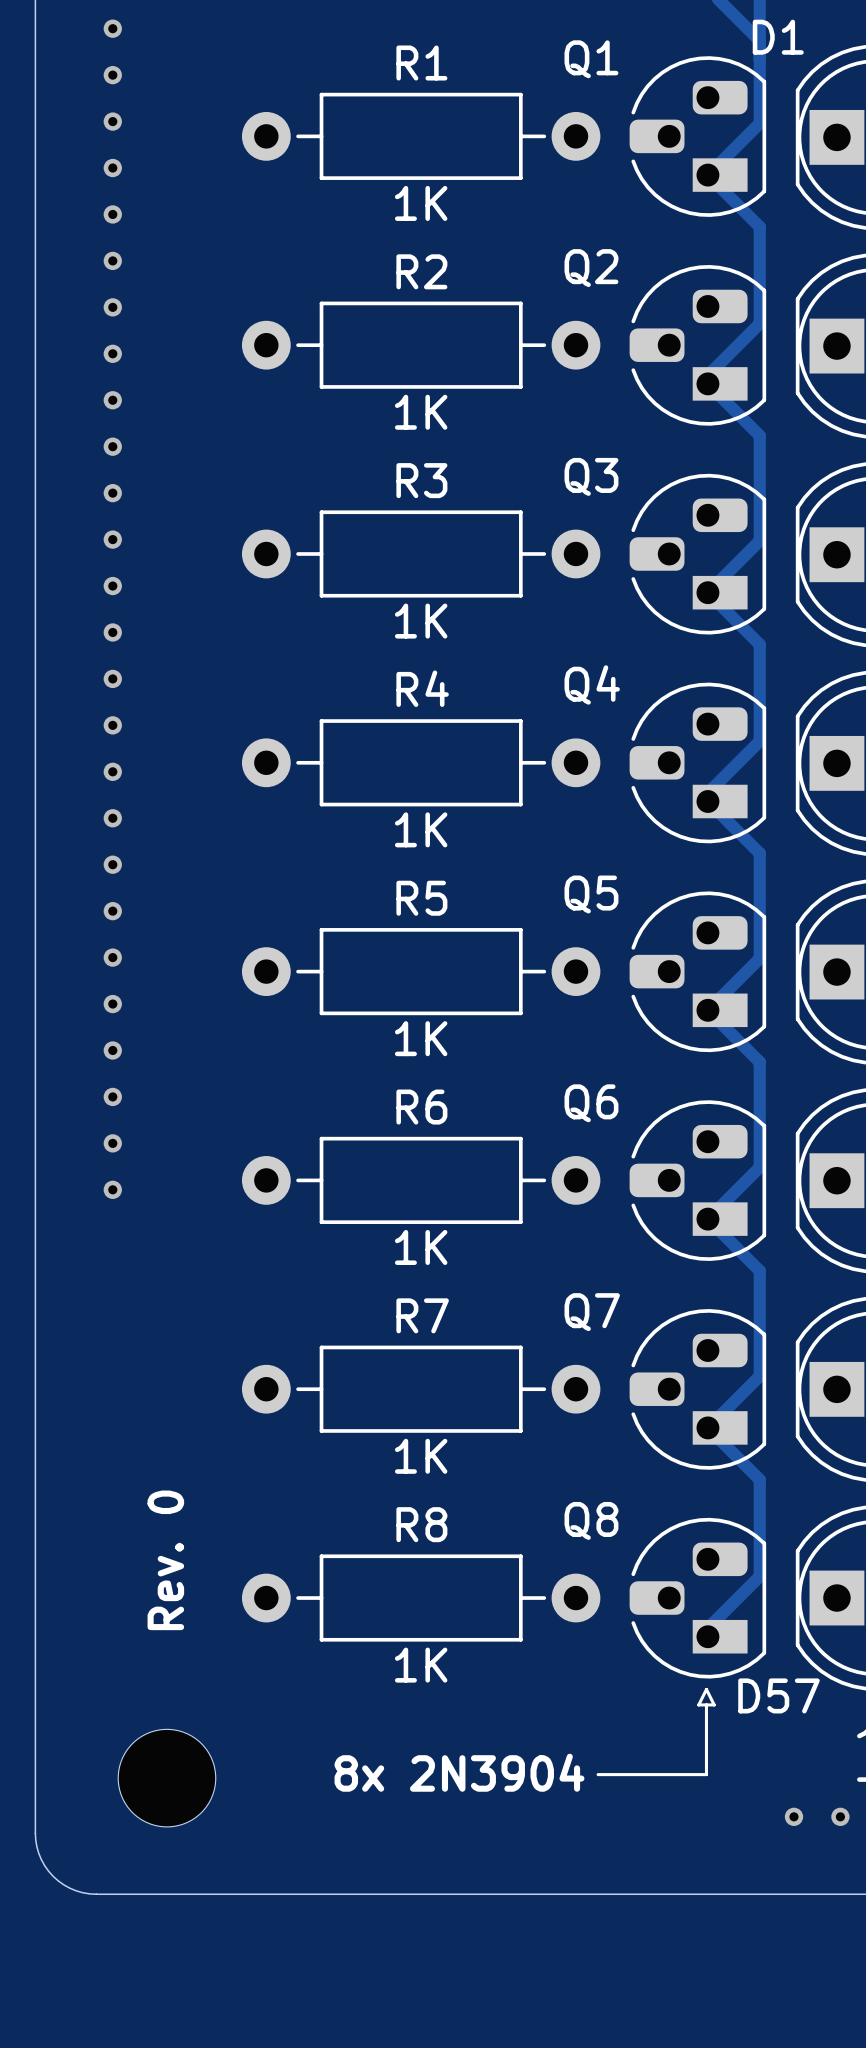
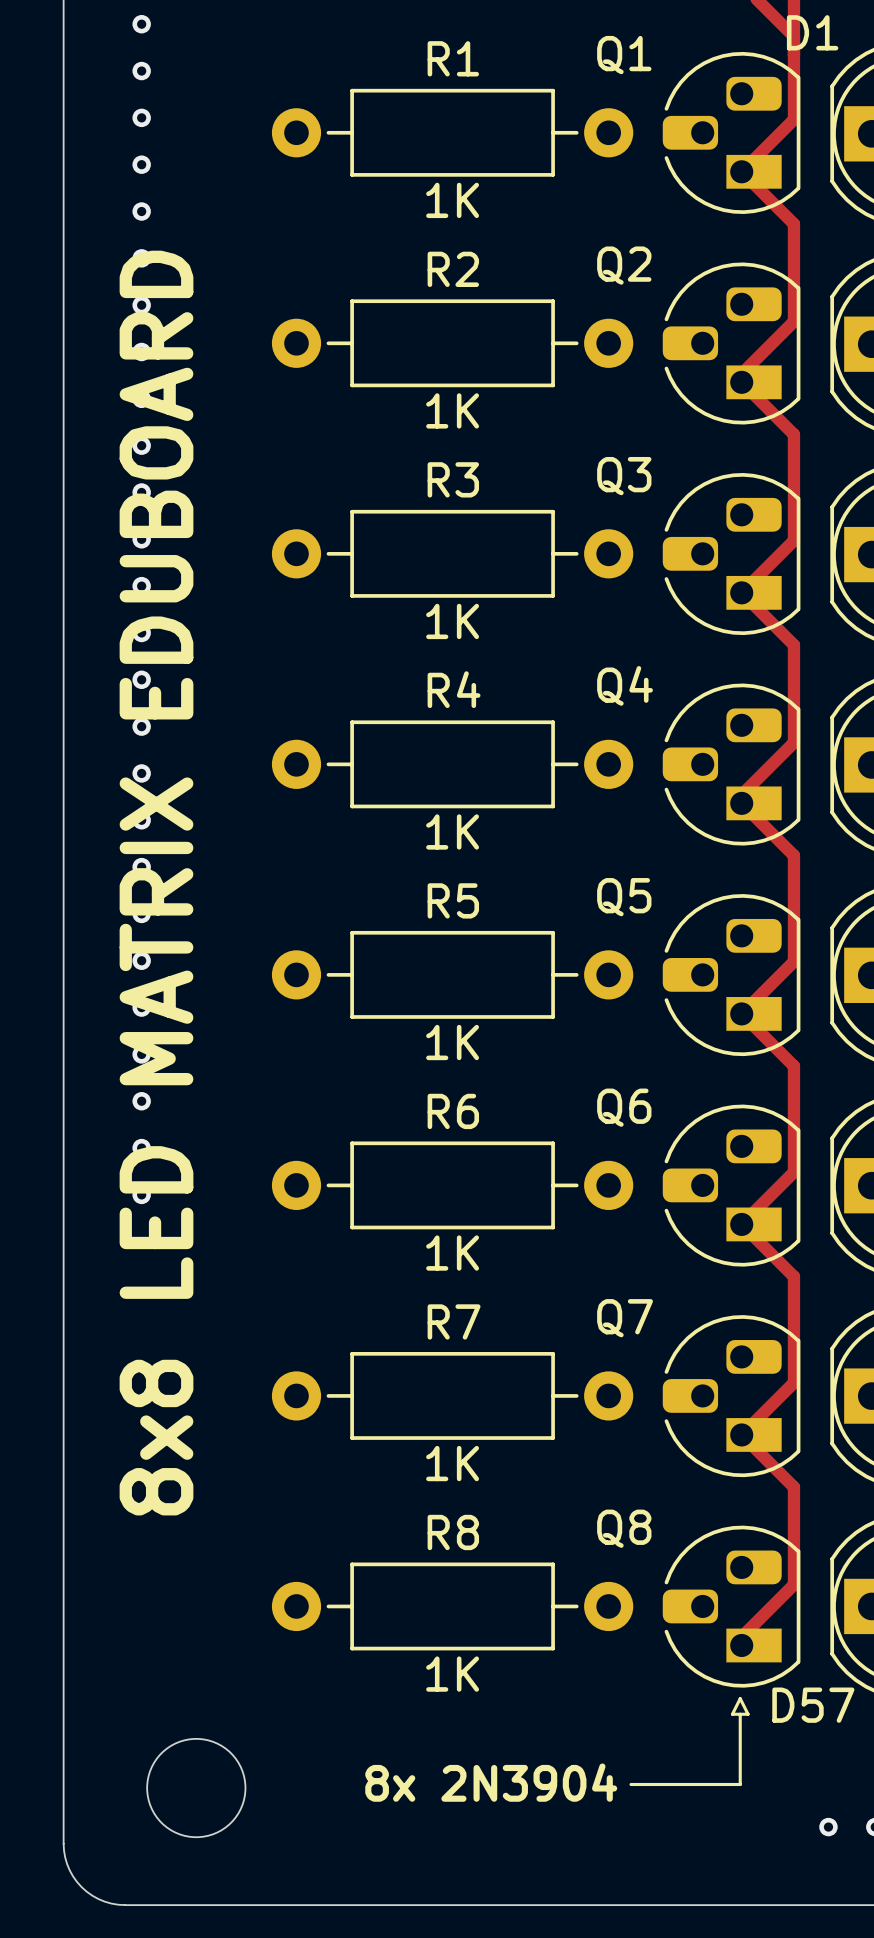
text: none -> 8x8 LED MATRIX EDUBOARD (156, 883)
text: Rev. 0 (165, 1560) -> none

